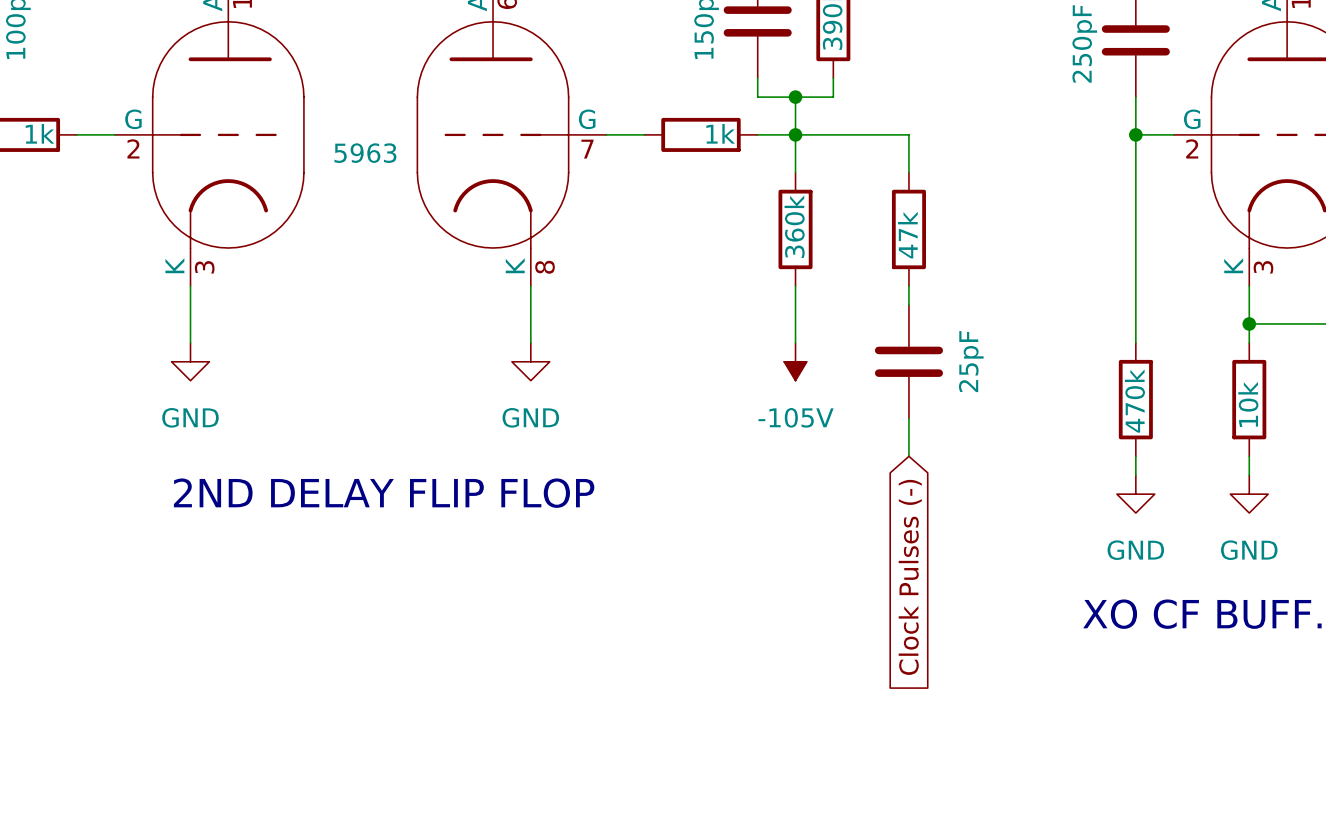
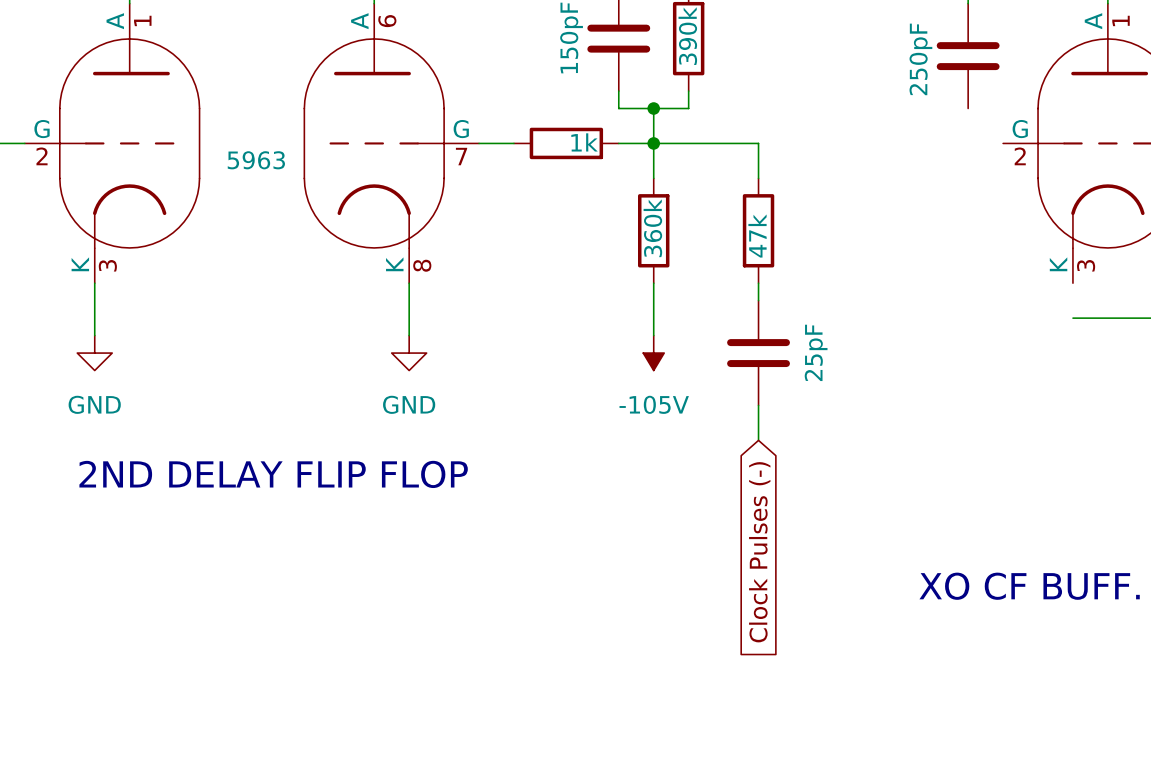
wire: (1135, 97) (1135, 342) -> none
wire: (1135, 134) (1173, 134) -> none
junction: (1135, 134) -> none
wire: (1249, 286) (1249, 342) -> none
junction: (1249, 323) -> none
part: 470k (1135, 399) -> none
part: 10k (1249, 399) -> none
wire: (1135, 456) (1135, 475) -> none
wire: (1249, 456) (1249, 475) -> none
power symbol: GND (1135, 494) -> none
power symbol: GND (1249, 494) -> none

